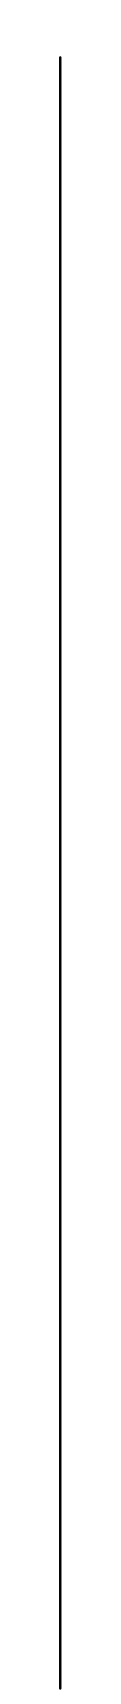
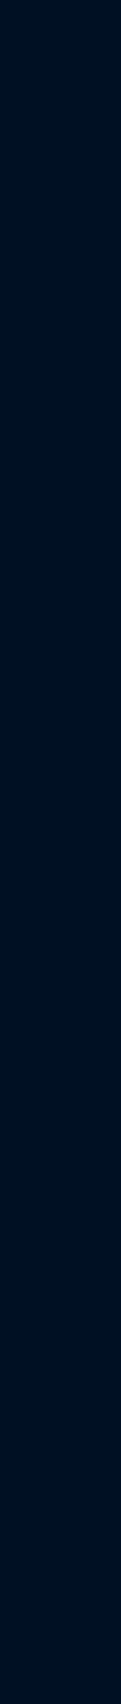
board edge: (60, 57) (60, 1688) -> none

